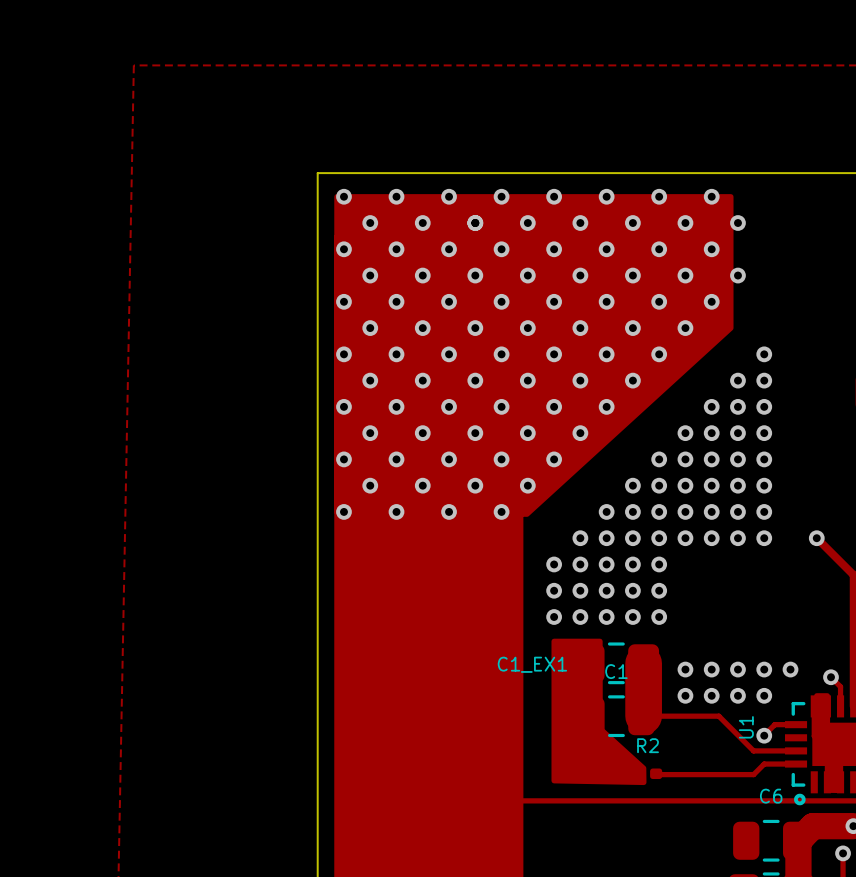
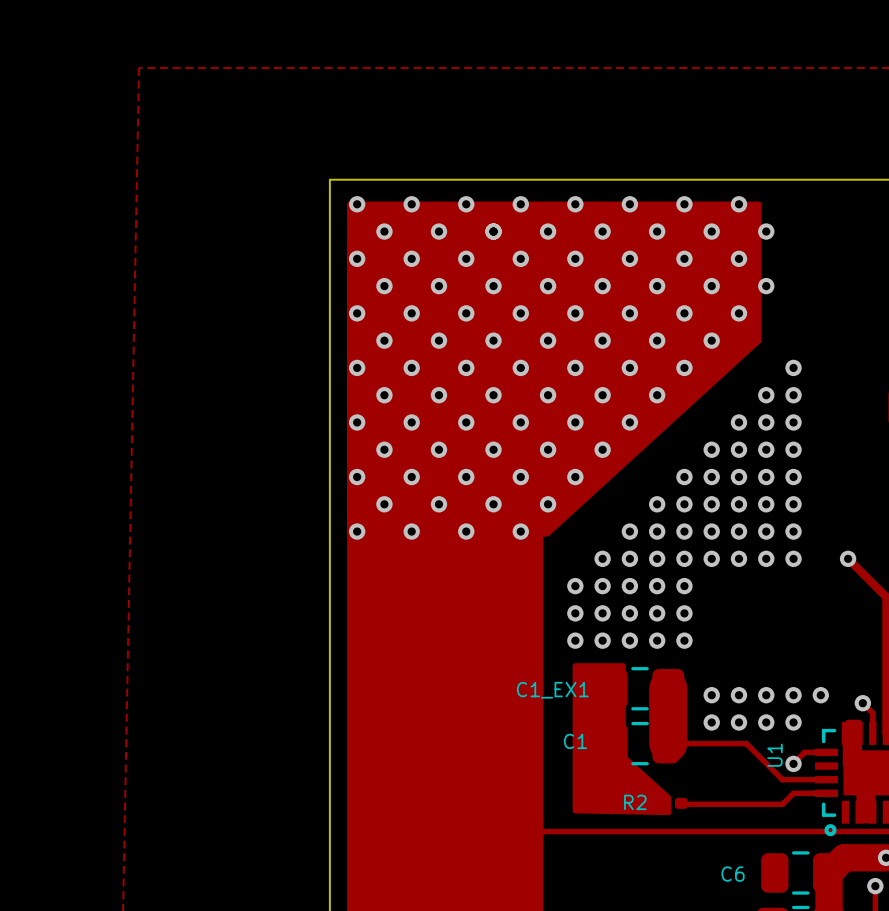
C1 name position: C1 (616, 671) -> C1 (575, 741)
R2 name position: R2 (648, 745) -> R2 (635, 802)
C6 name position: C6 (771, 796) -> C6 (733, 874)

